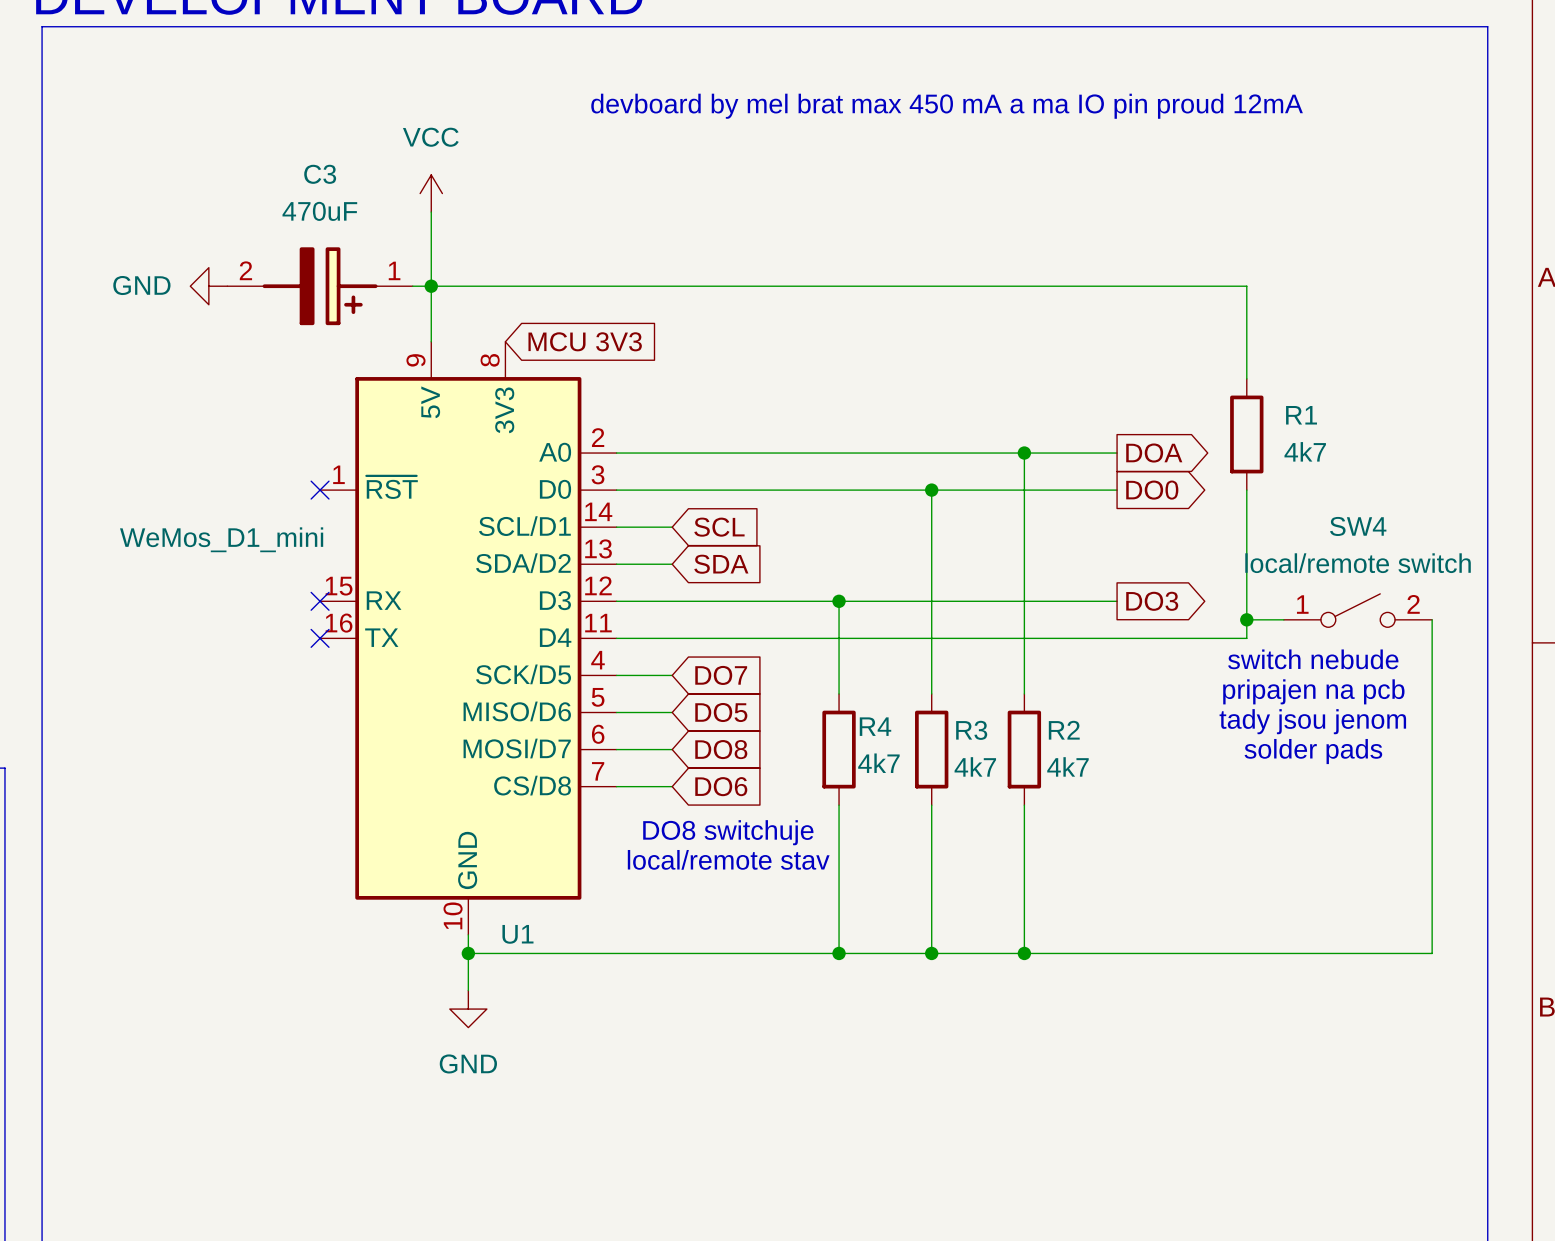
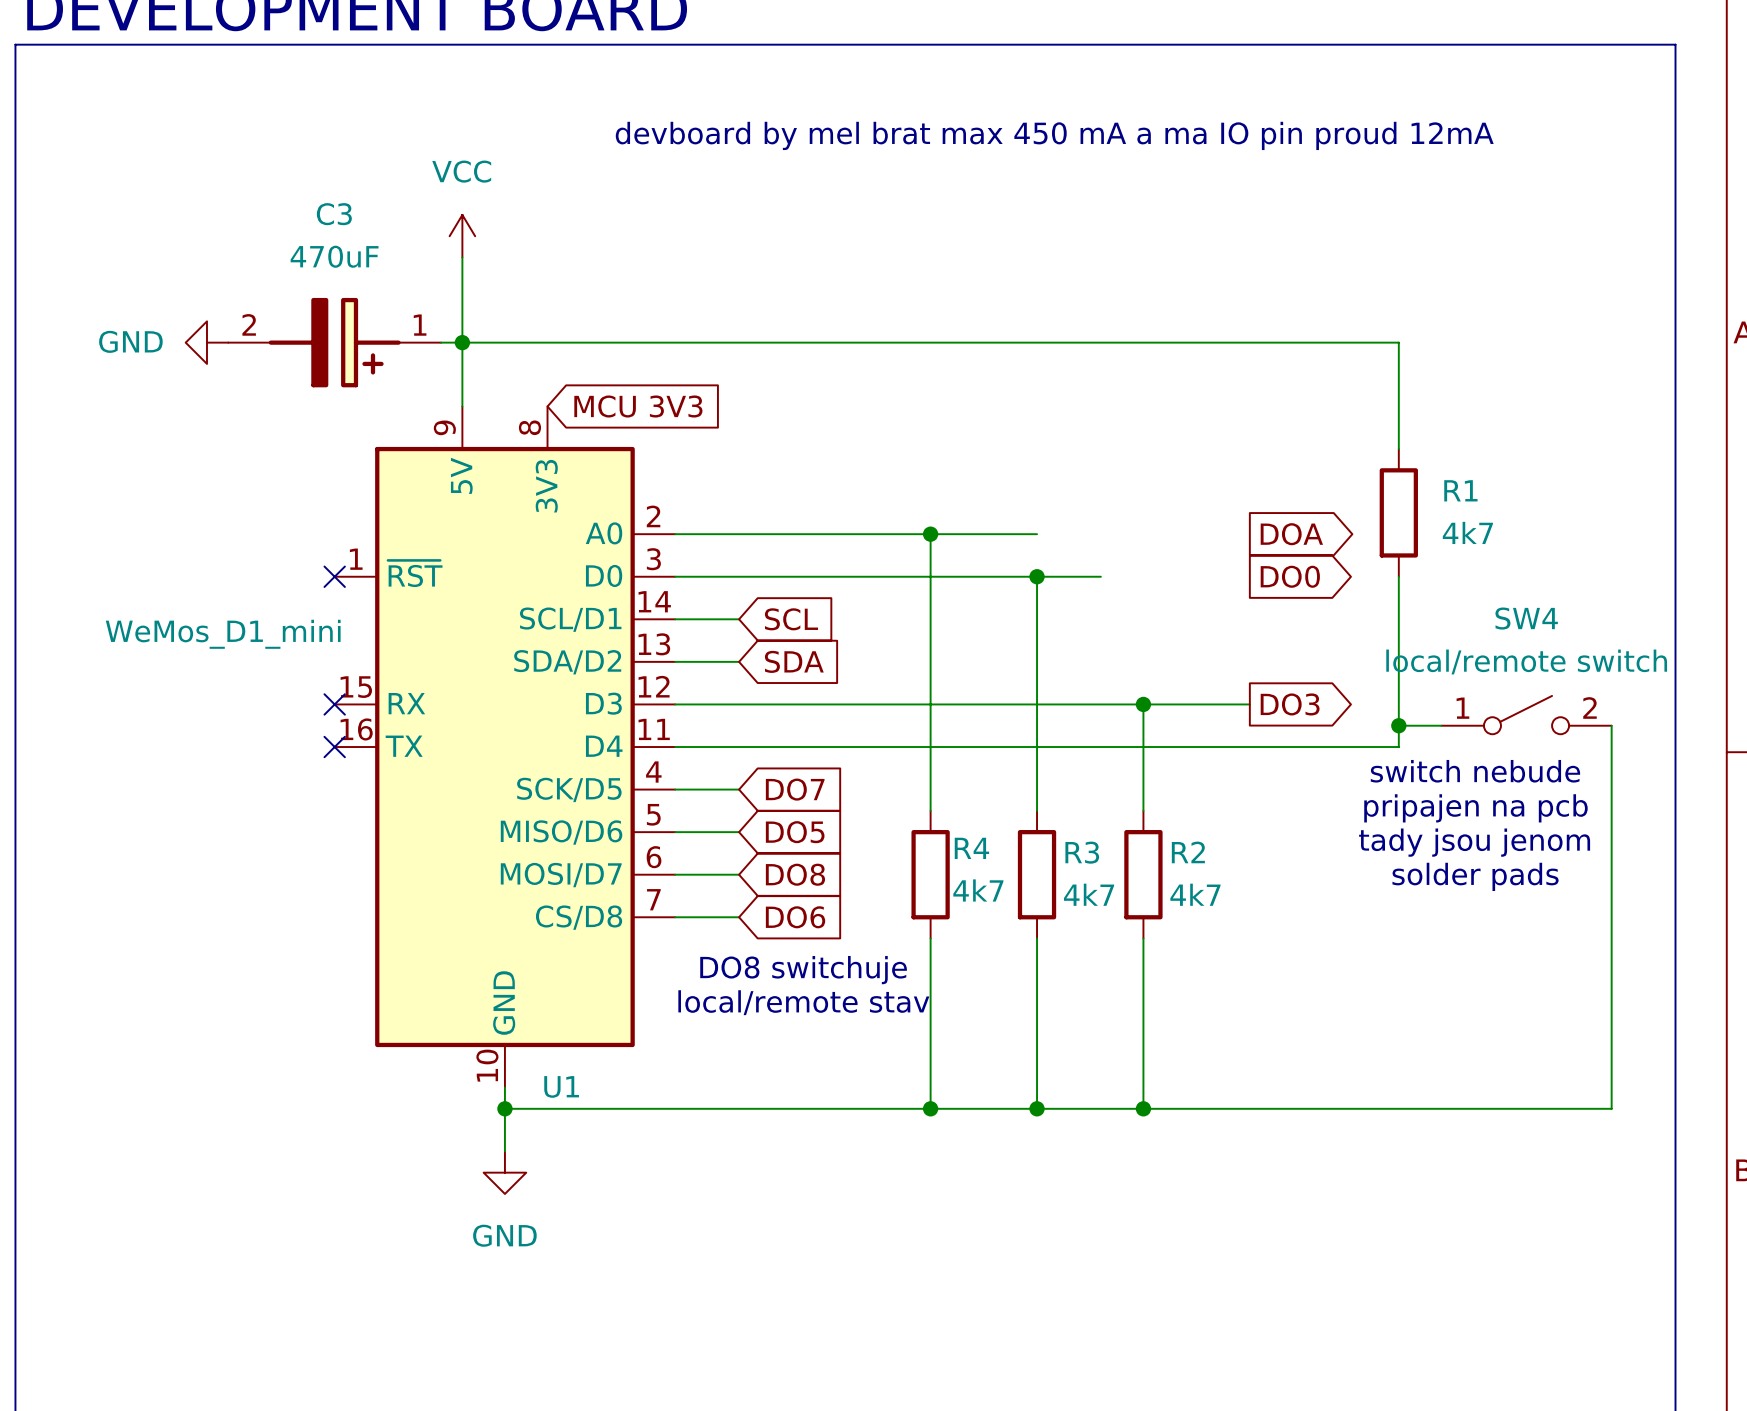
junction: none -> (930, 534)
wire: (931, 453) (1117, 453) -> none
wire: (1024, 453) (1024, 601) -> (930, 534) (930, 704)
junction: (1024, 453) -> none
wire: (987, 490) (1117, 490) -> none
junction: (839, 601) -> none
junction: none -> (1143, 704)

